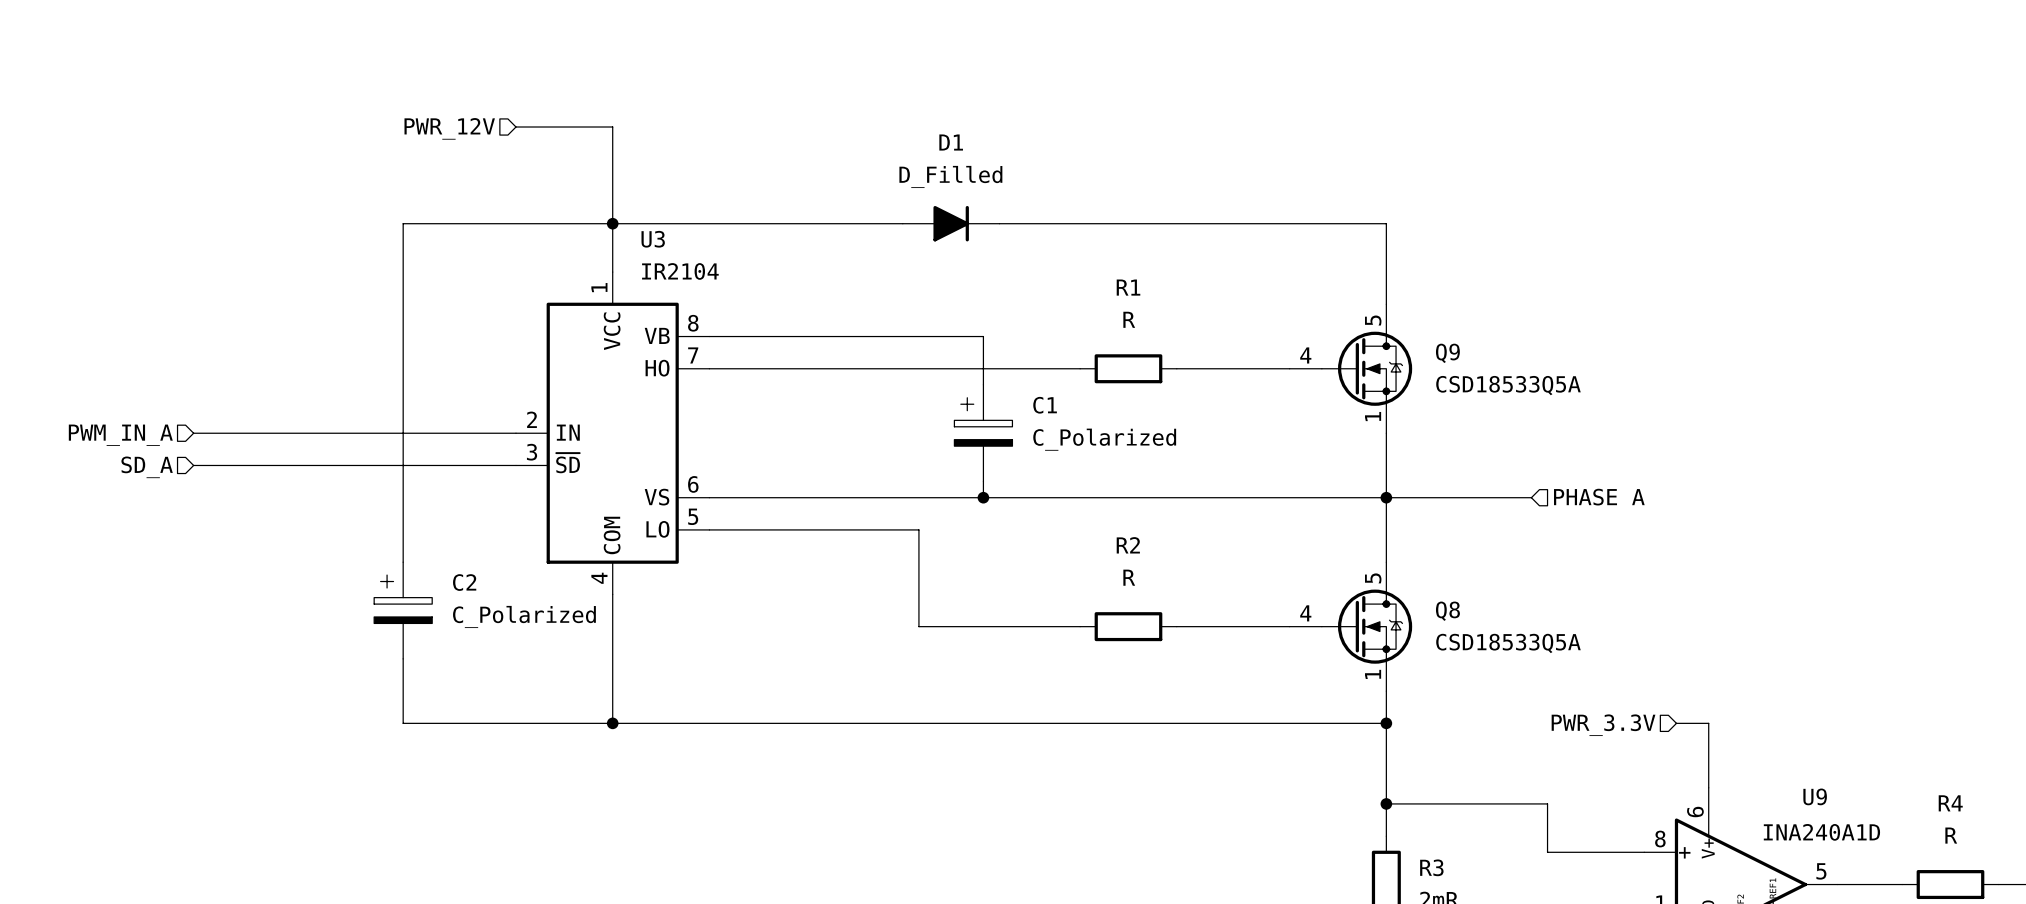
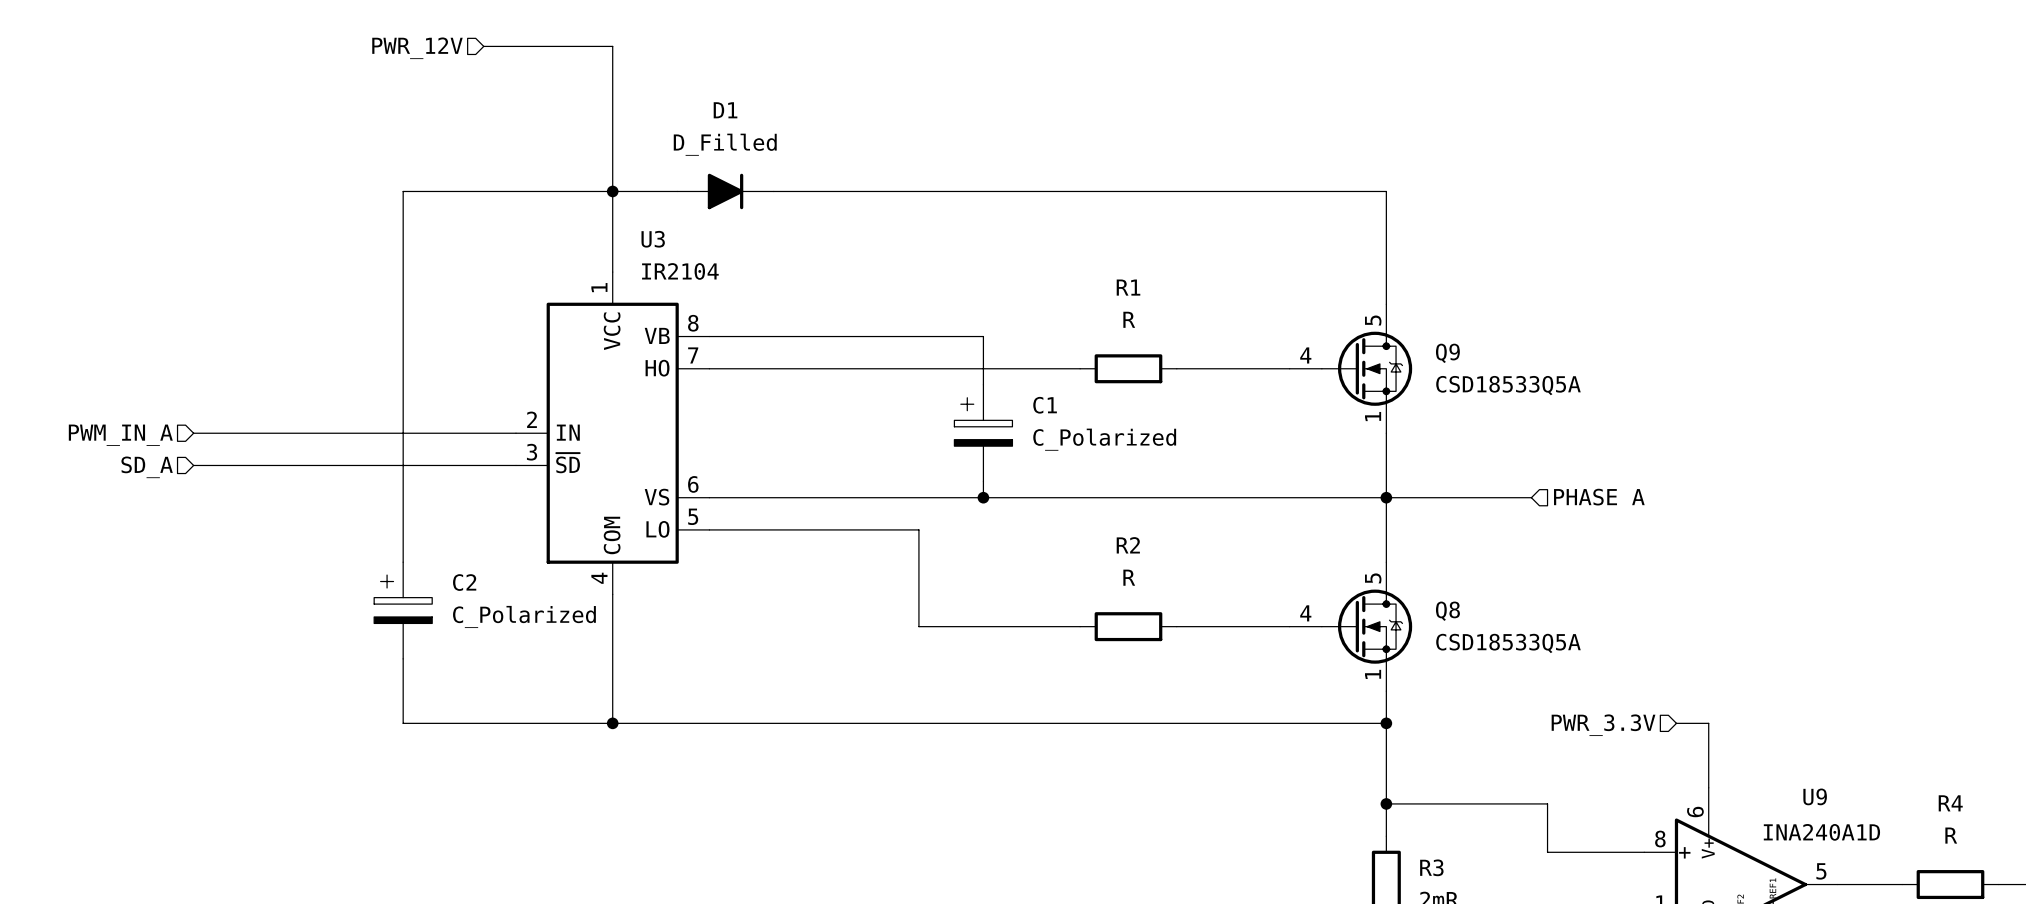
wire: (516, 127) (612, 127) -> (483, 46) (612, 46) (612, 127)
hierarchical label position: PWR_12V (449, 128) -> PWR_12V (417, 48)
wire: (403, 223) (902, 223) -> (403, 223) (403, 191) (677, 191)
junction position: (612, 223) -> (612, 191)
D1 position: (951, 223) -> (725, 191)
wire: (999, 223) (1386, 223) -> (773, 191) (1386, 191) (1386, 223)

